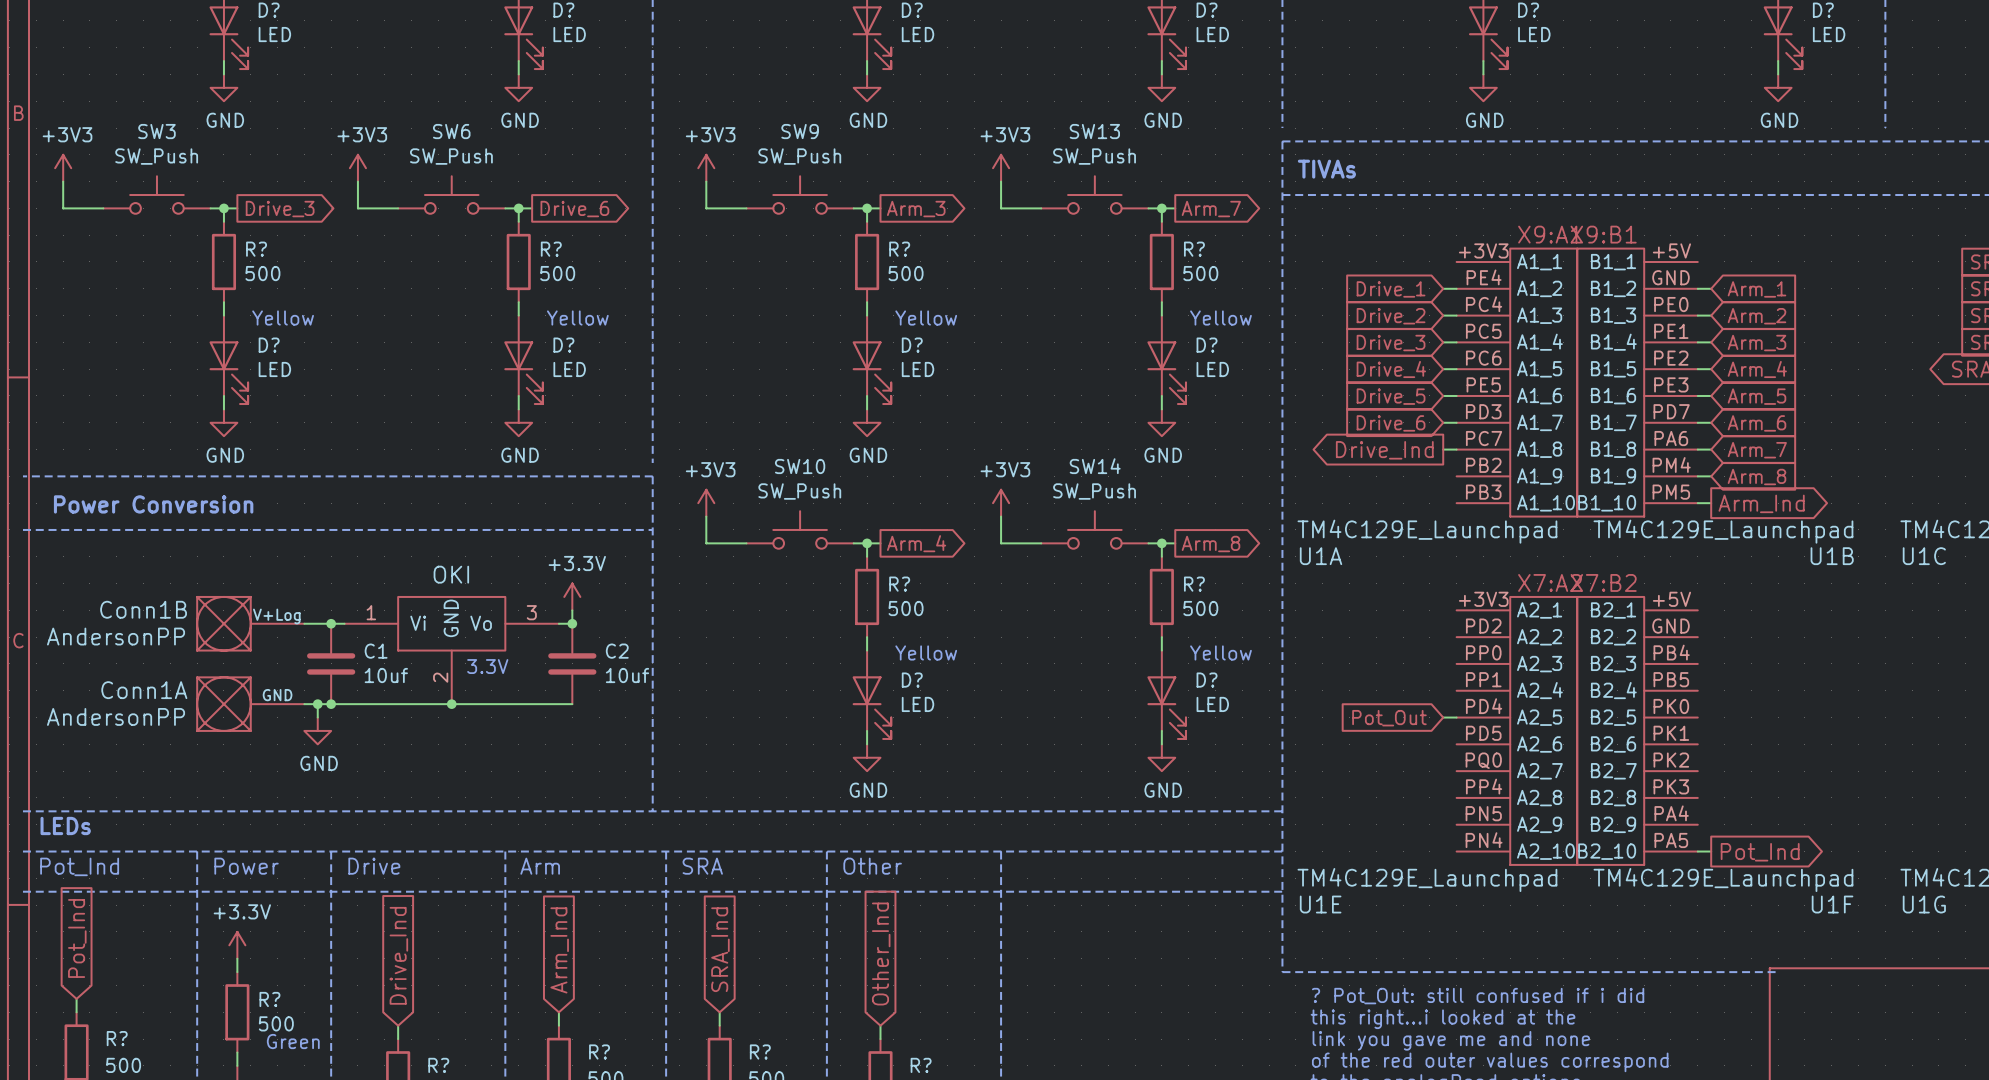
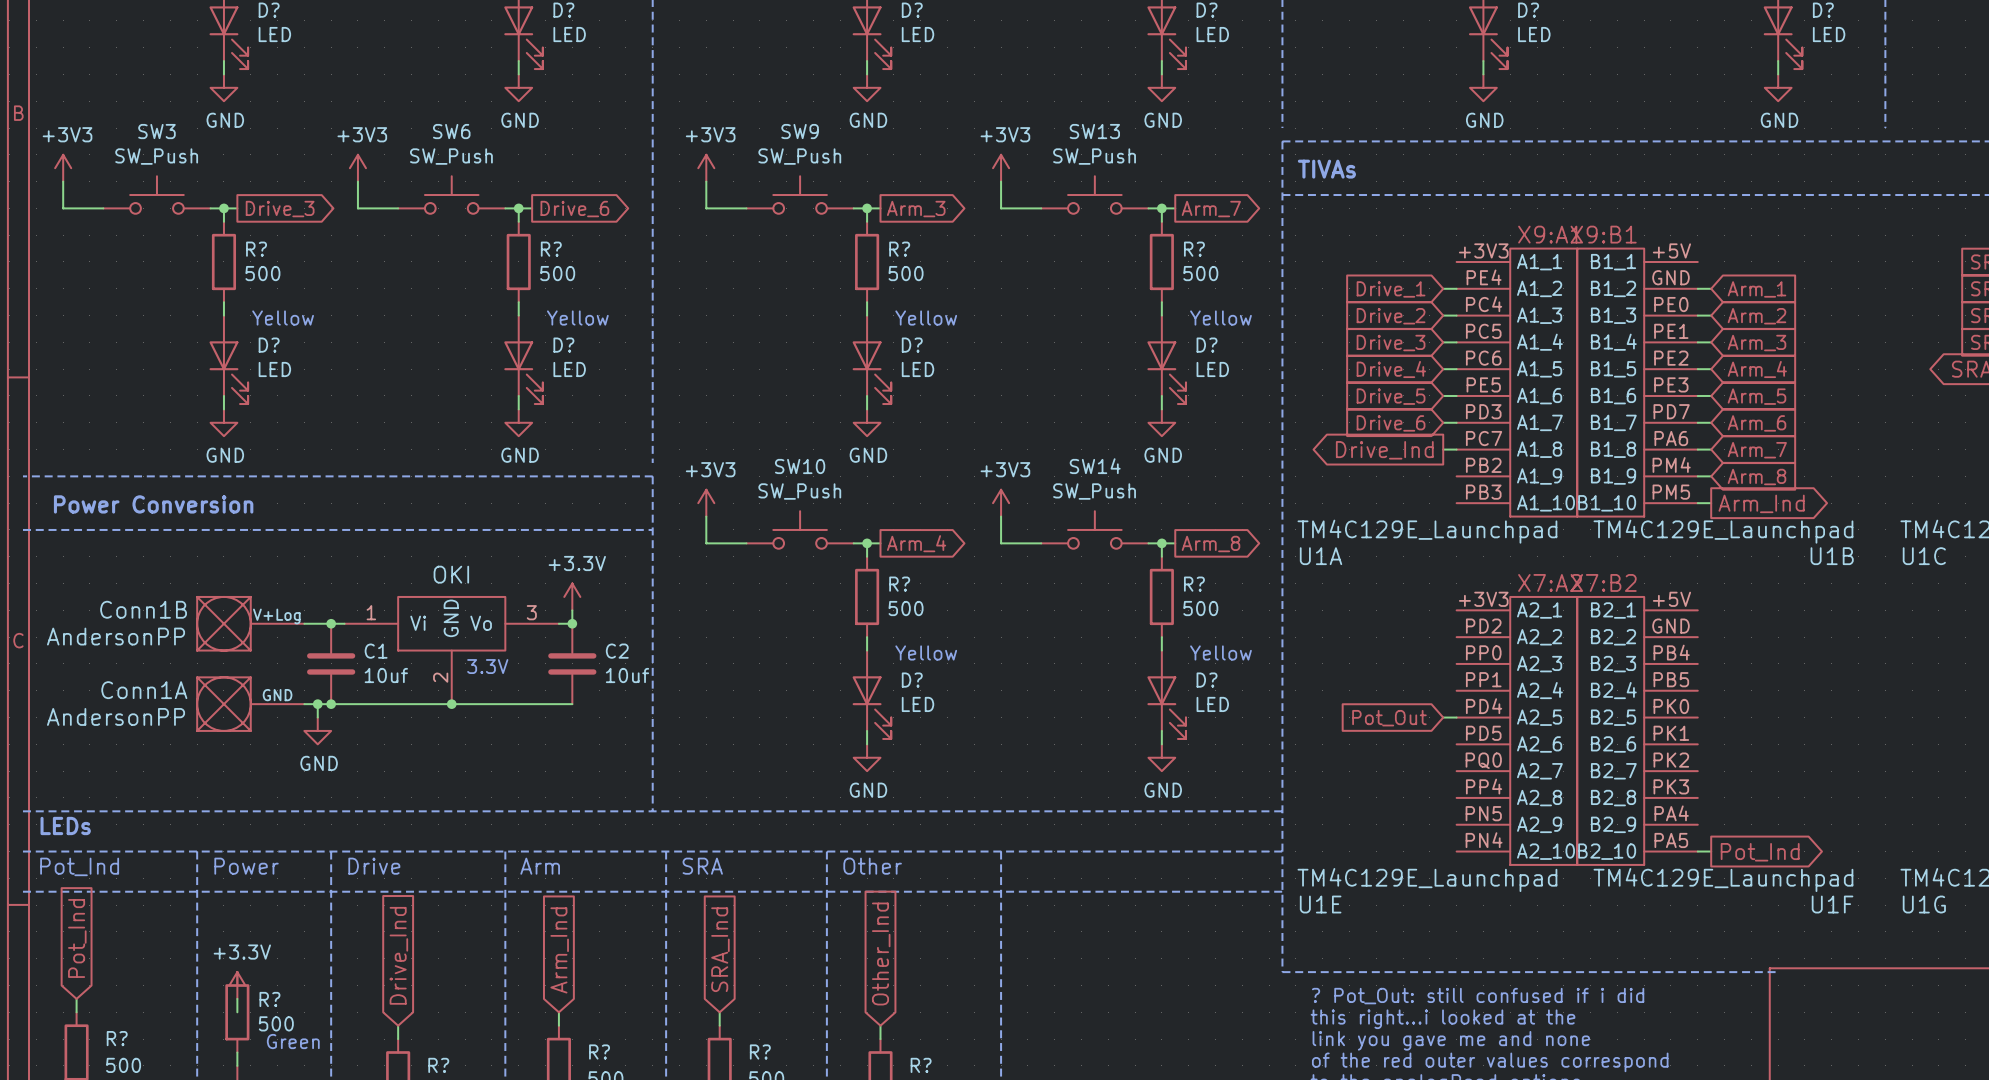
power symbol position: +3.3V (237, 945) -> +3.3V (237, 985)
wire: (237, 958) (237, 972) -> (237, 998) (237, 1012)

